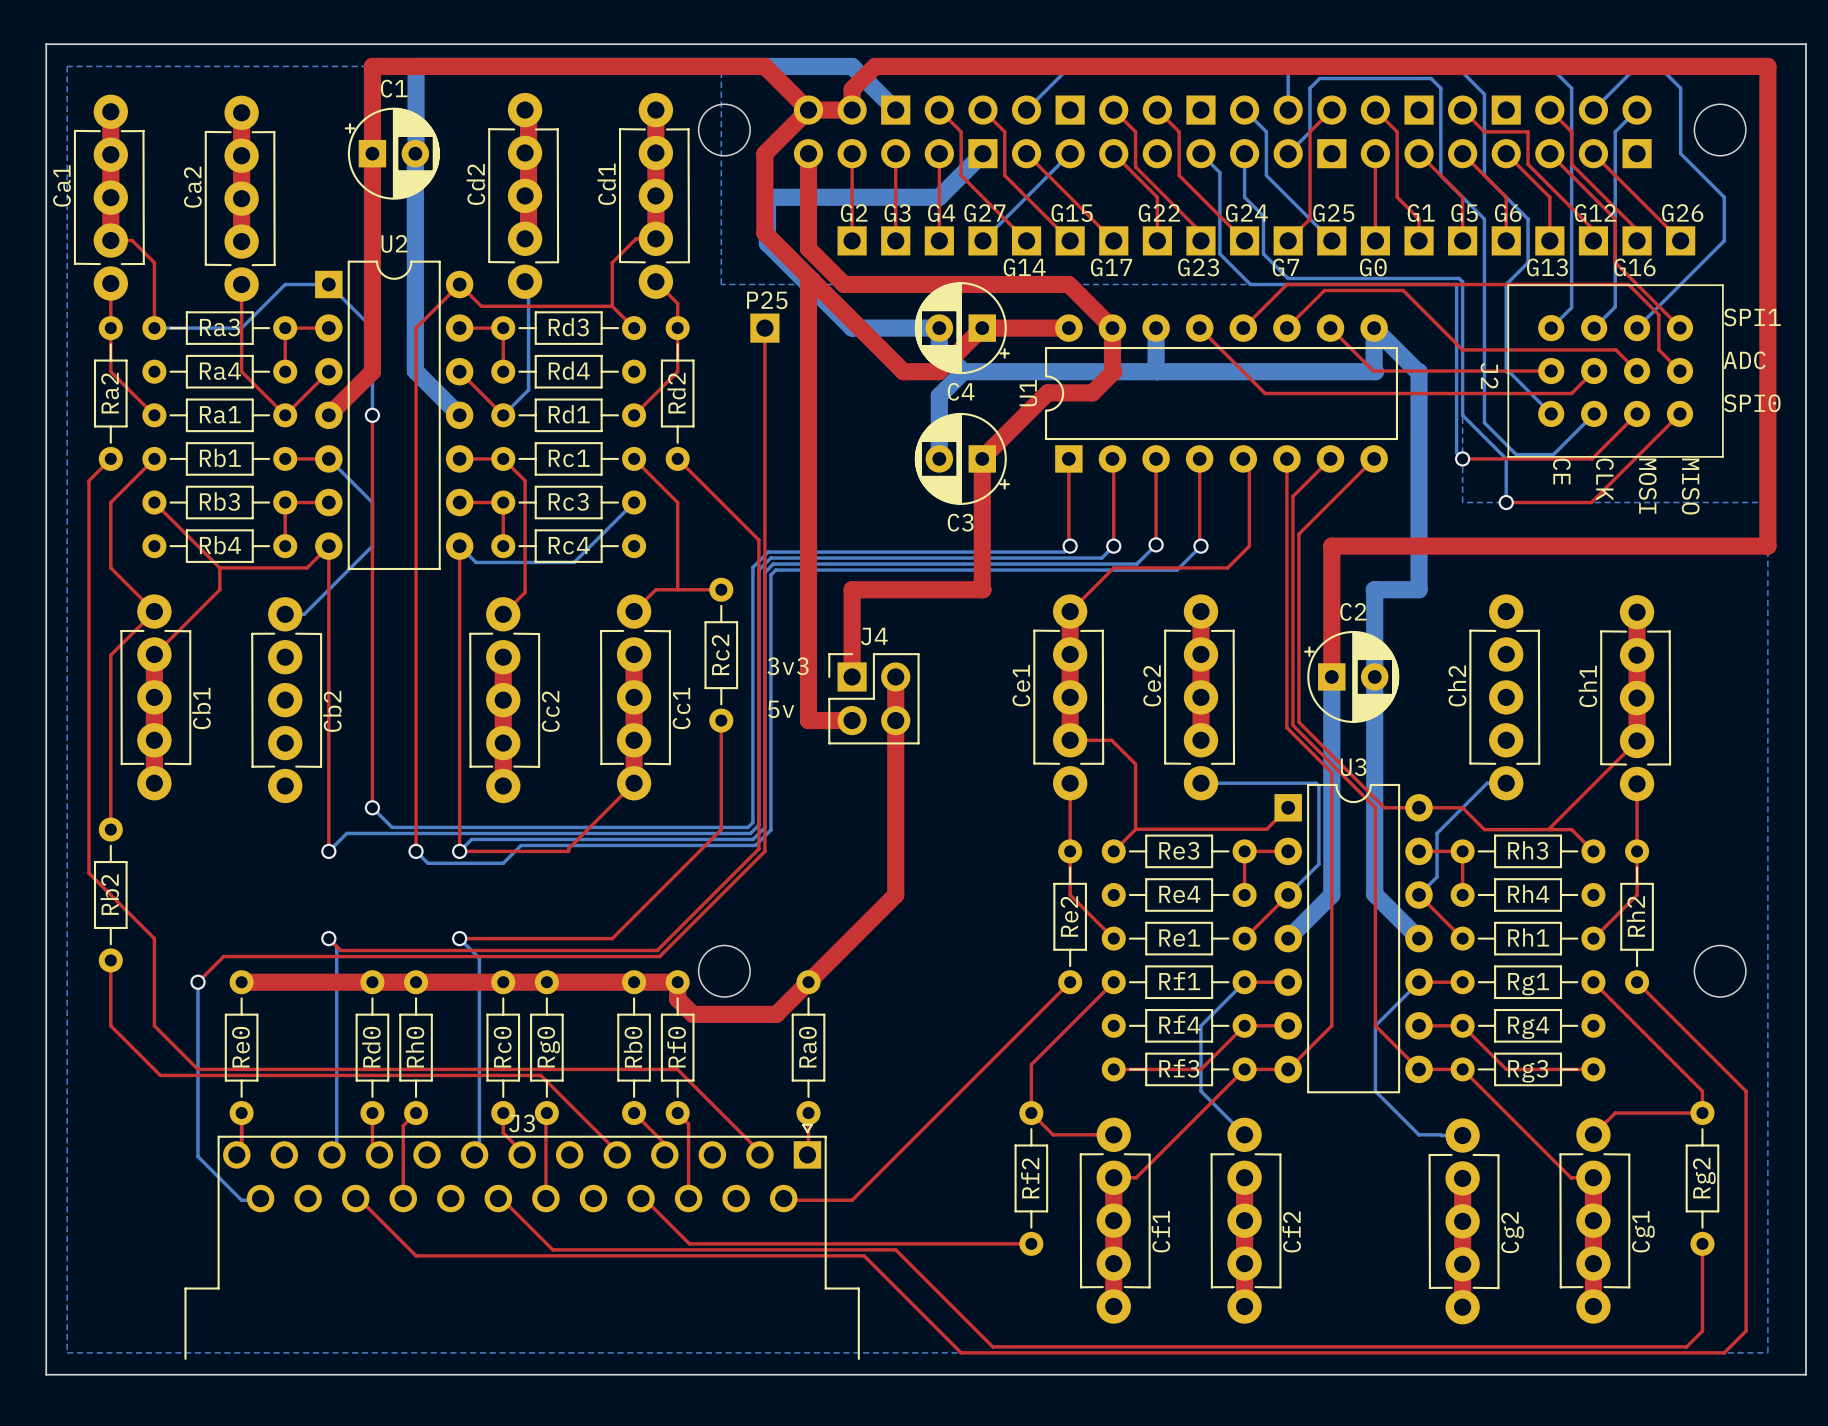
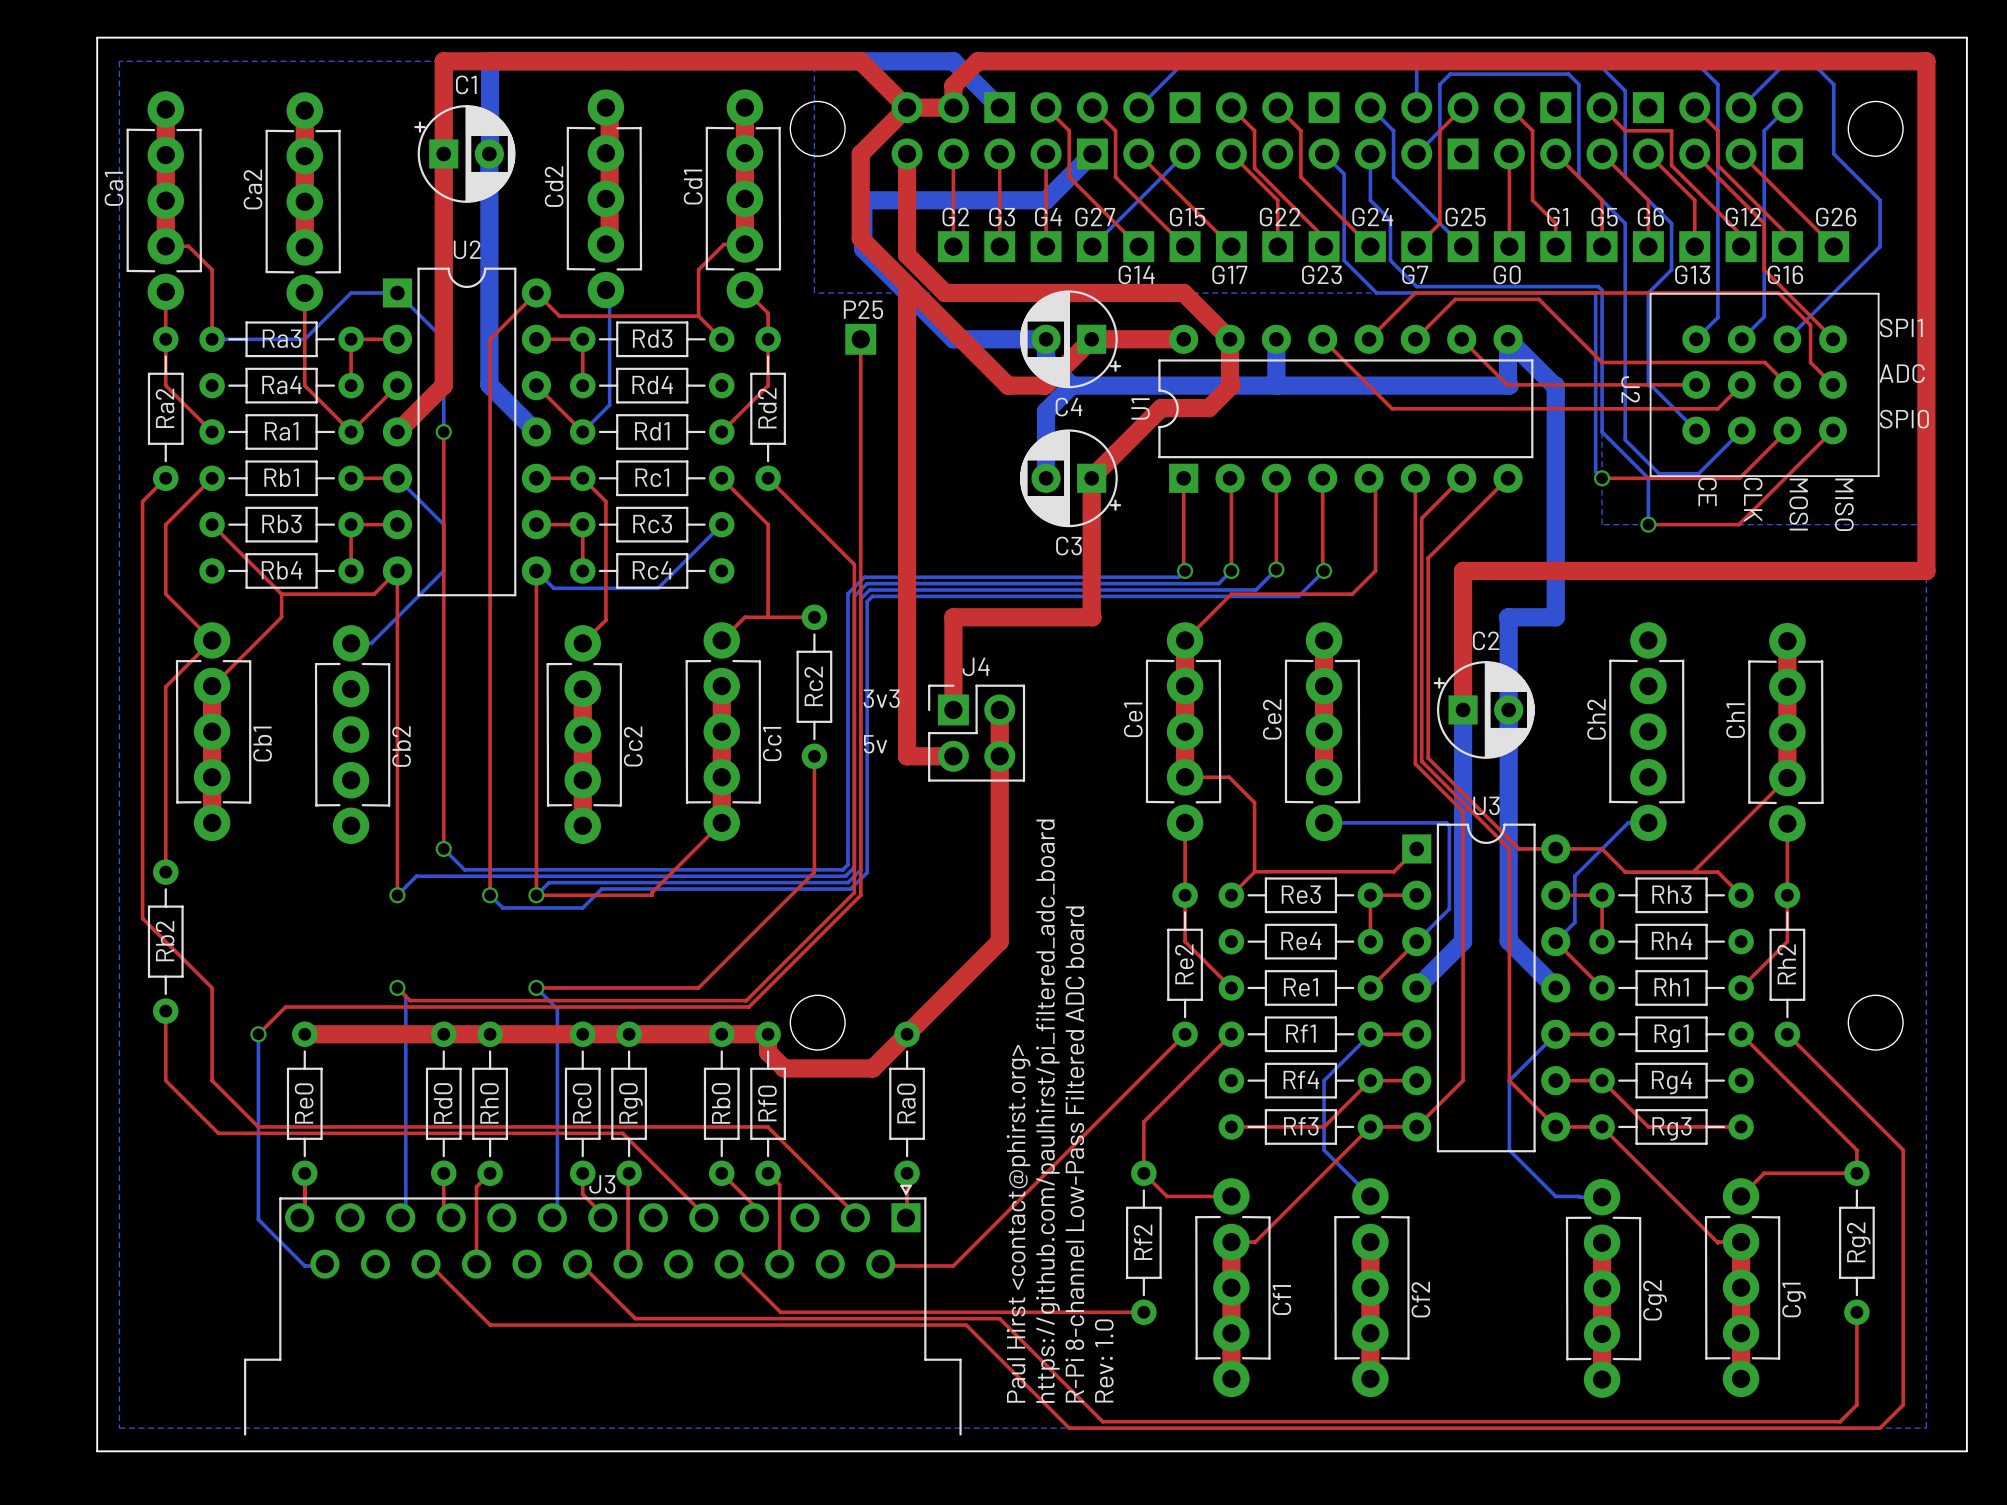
text: none -> https://github.com/paulhirst/pi_filtered_adc_board (1047, 1111)
text: none -> R-Pi 8-channel Low-Pass Filtered ADC board (1074, 1154)
text: none -> Paul Hirst <contact@phirst.org> (1018, 1223)
text: none -> Rev: 1.0 (1104, 1360)

